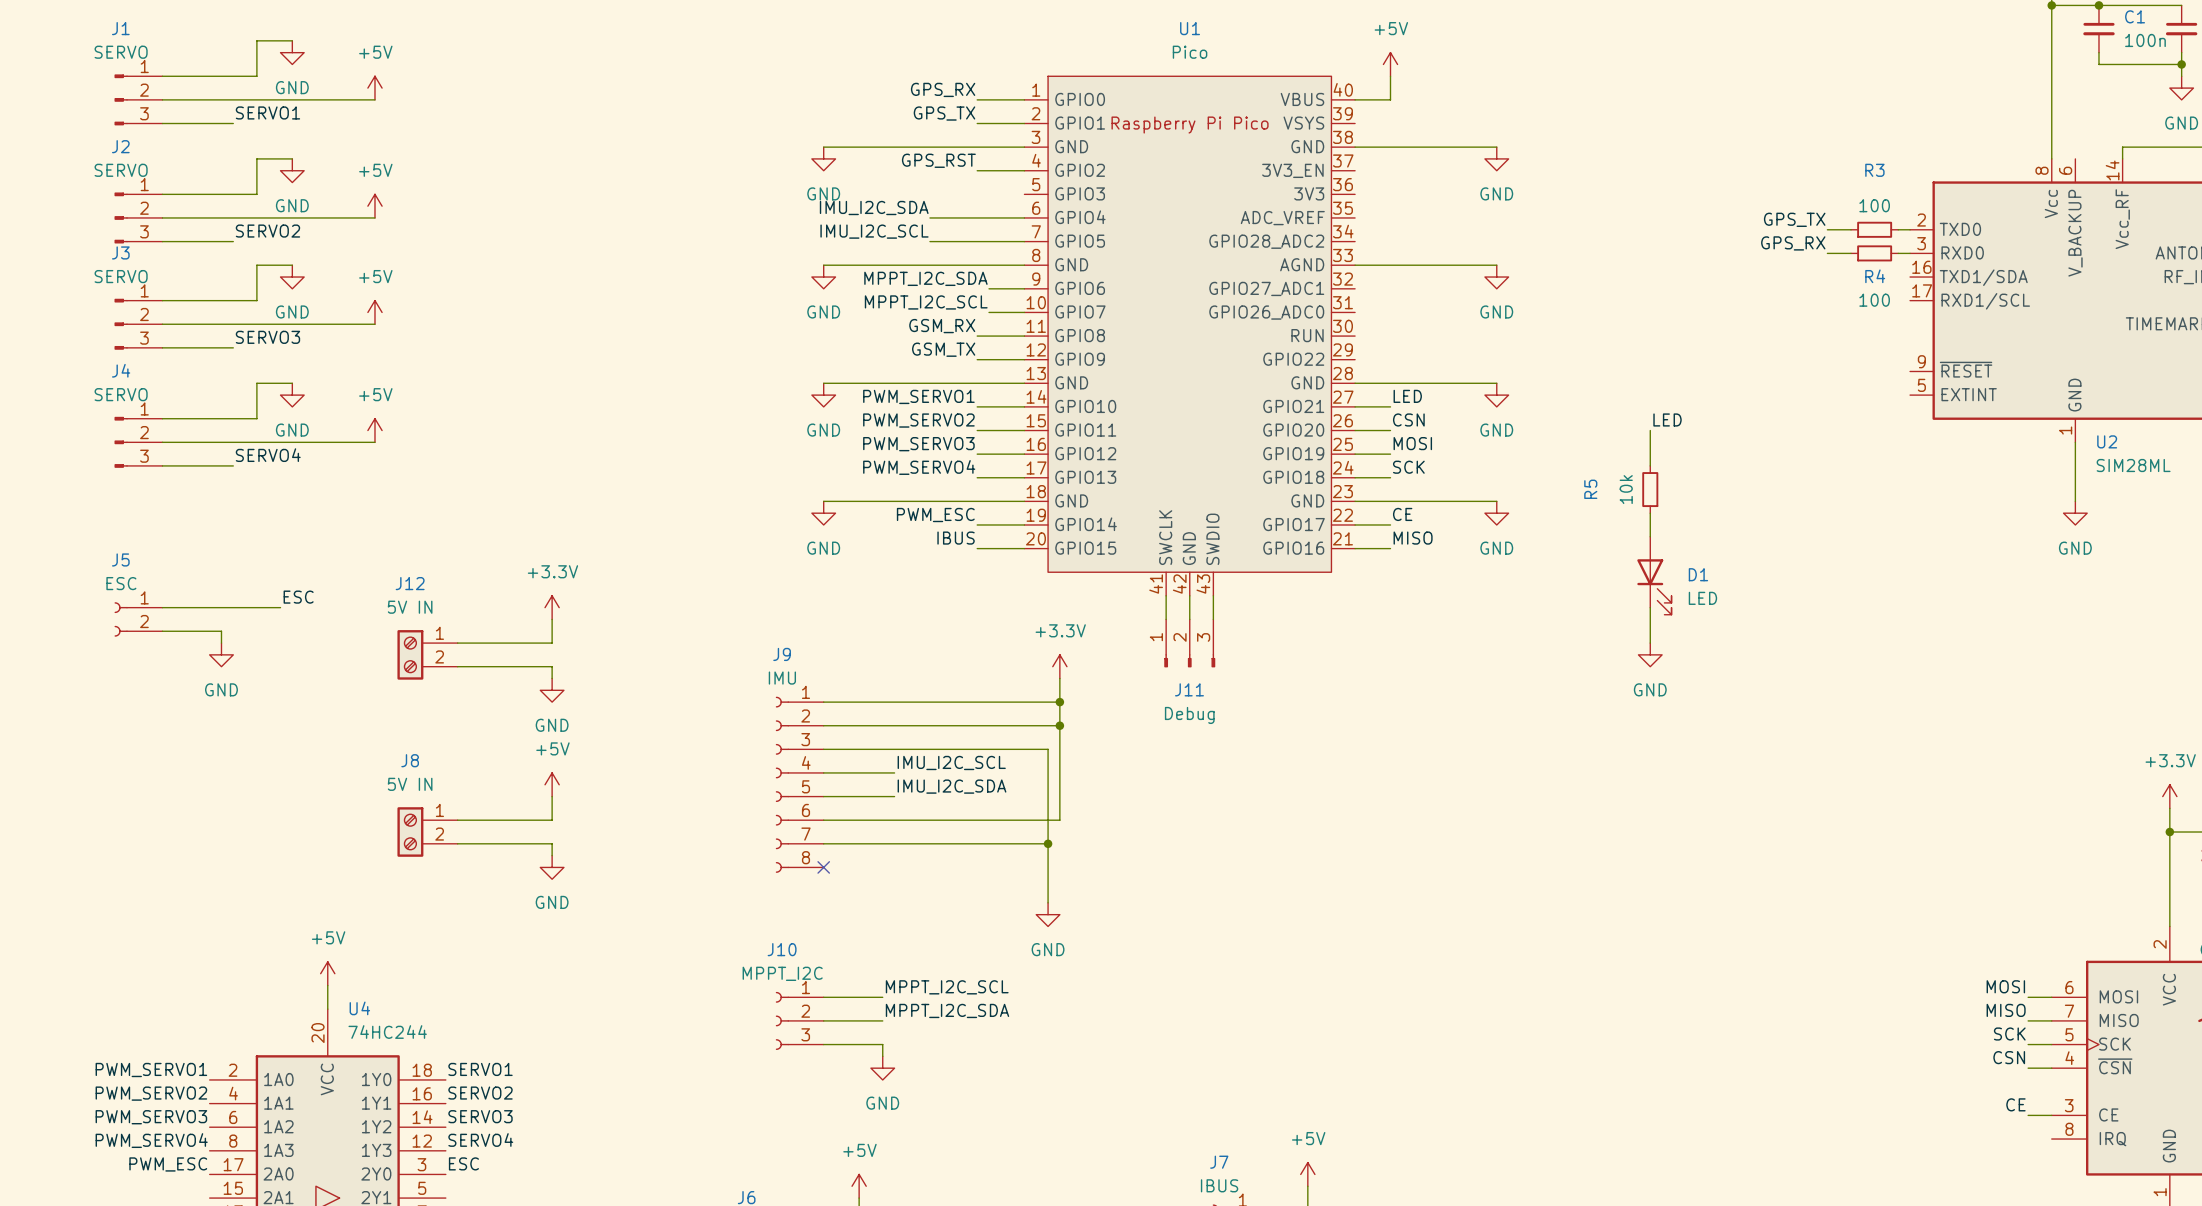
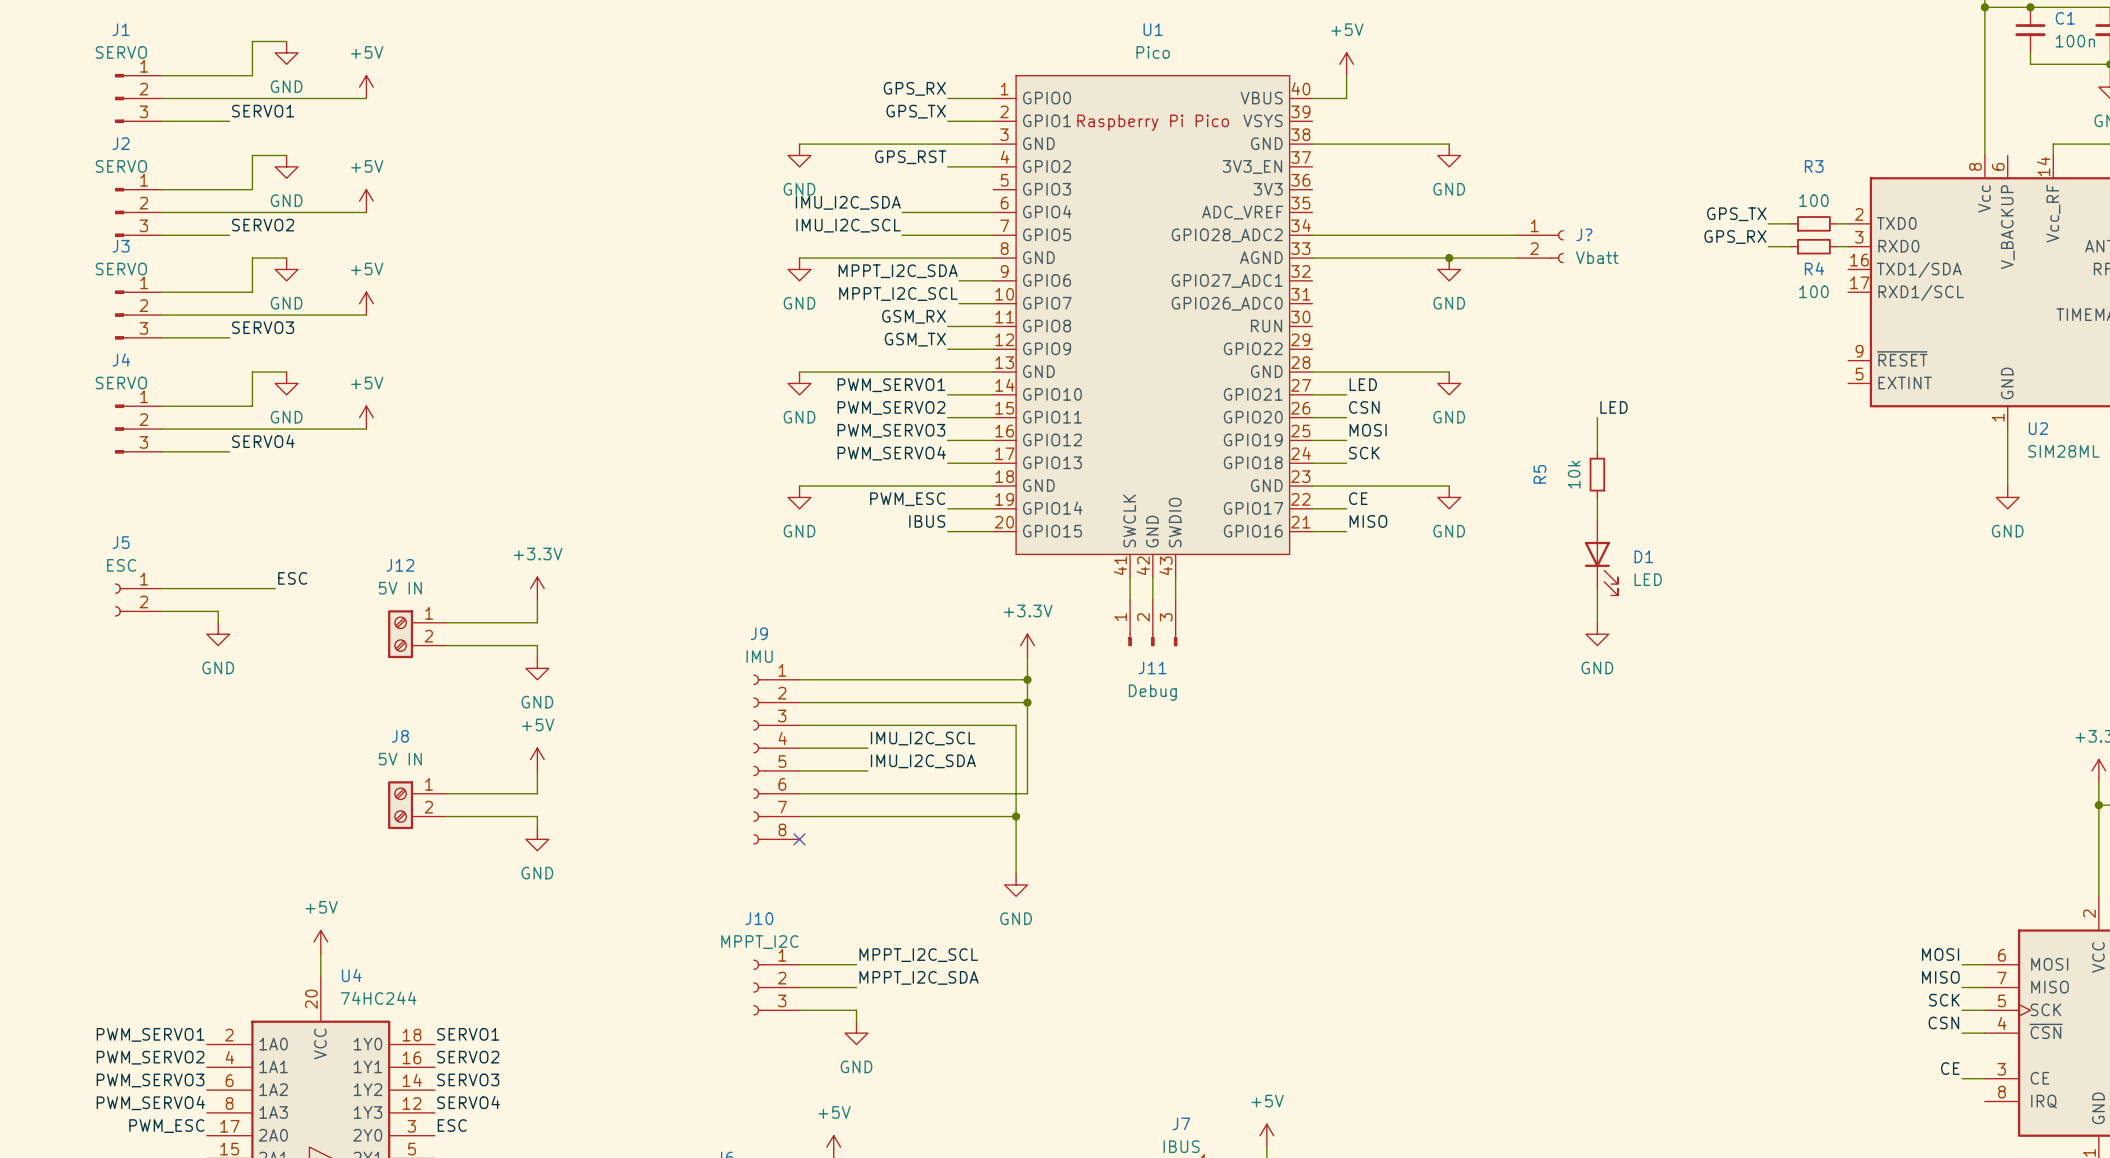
wire: none -> (1312, 235) (1517, 235)
J?: none -> Vbatt (1540, 246)
wire: none -> (1449, 258) (1517, 258)
junction: none -> (1449, 258)

